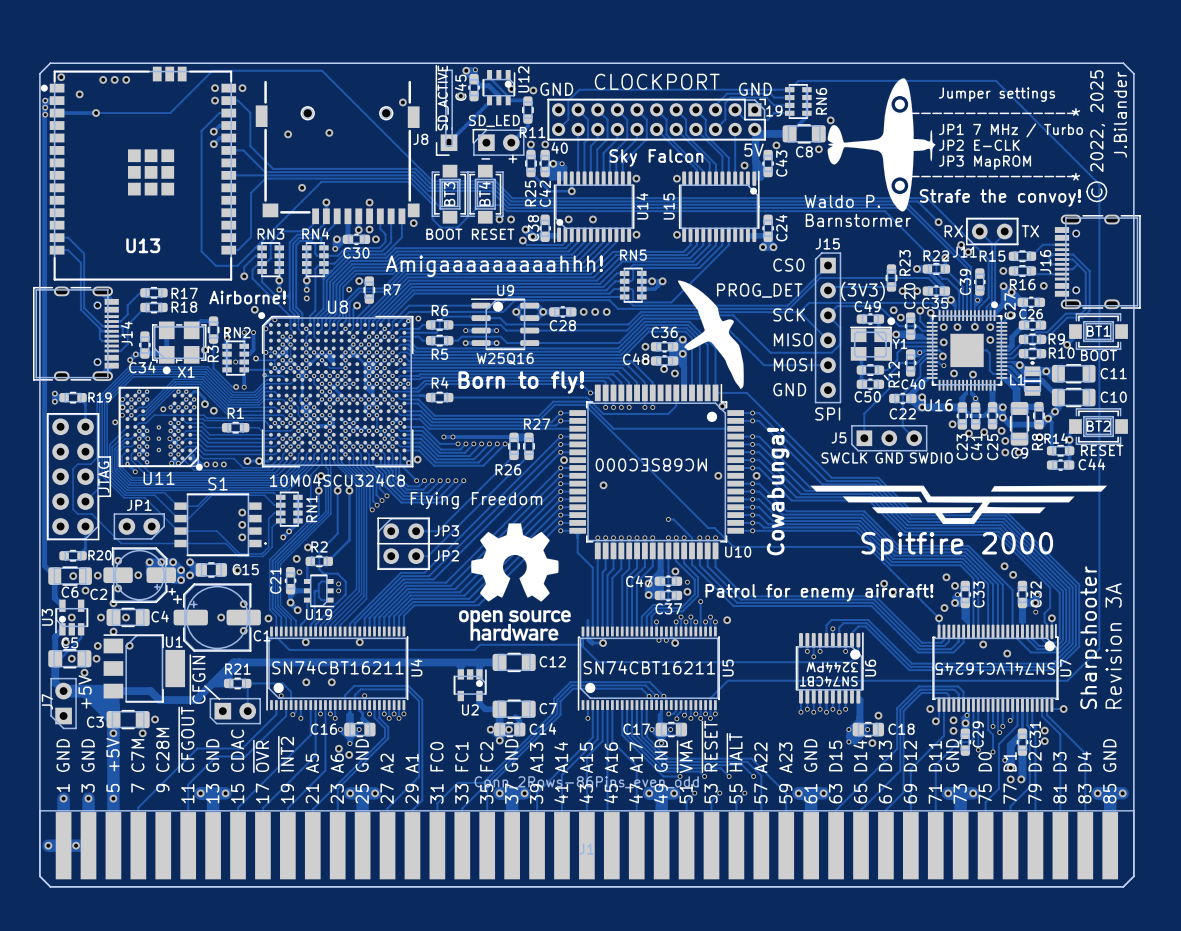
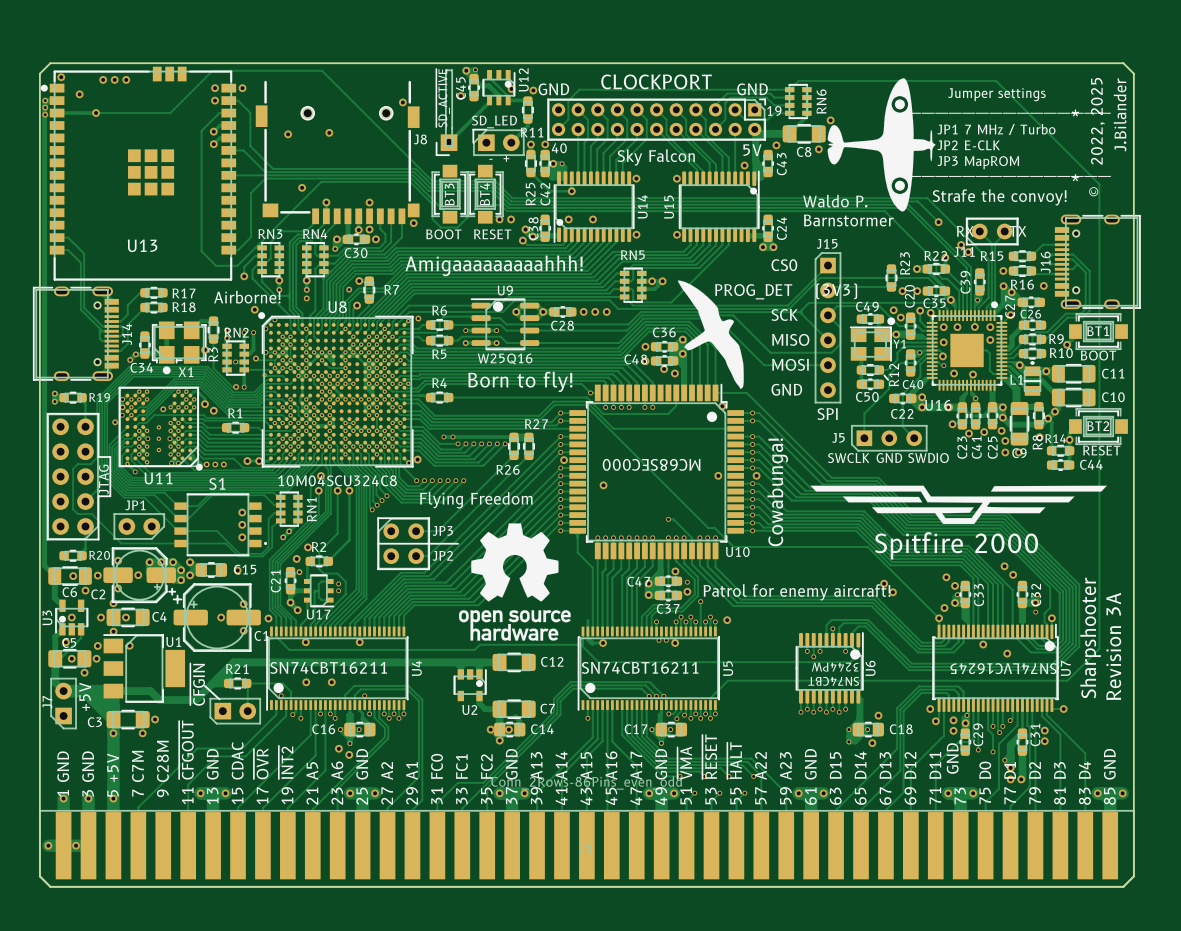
U19 name: U19 (319, 614) -> U17 (318, 614)

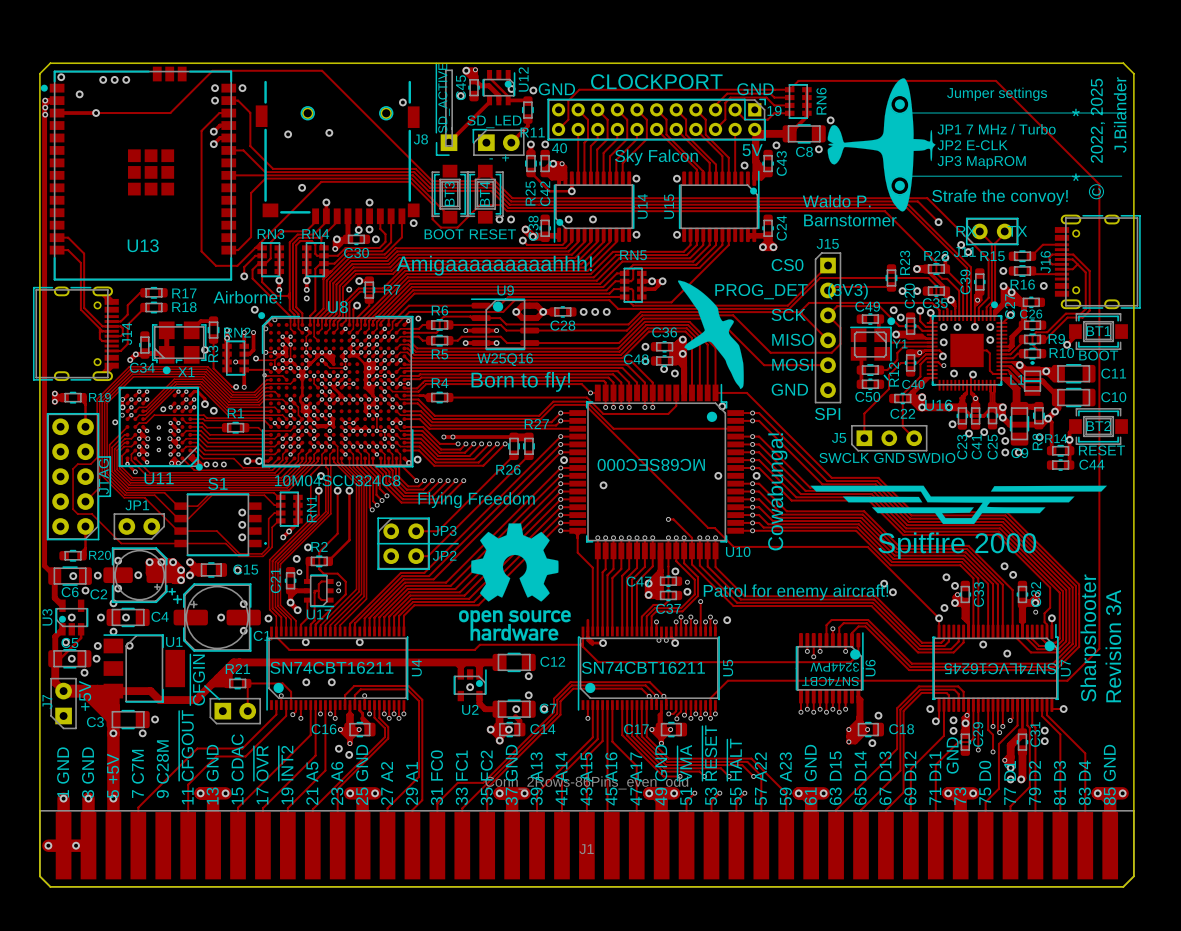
via: none -> (528, 676)
via: none -> (470, 687)
via: none -> (528, 695)
via: none -> (516, 709)
via: none -> (544, 709)

